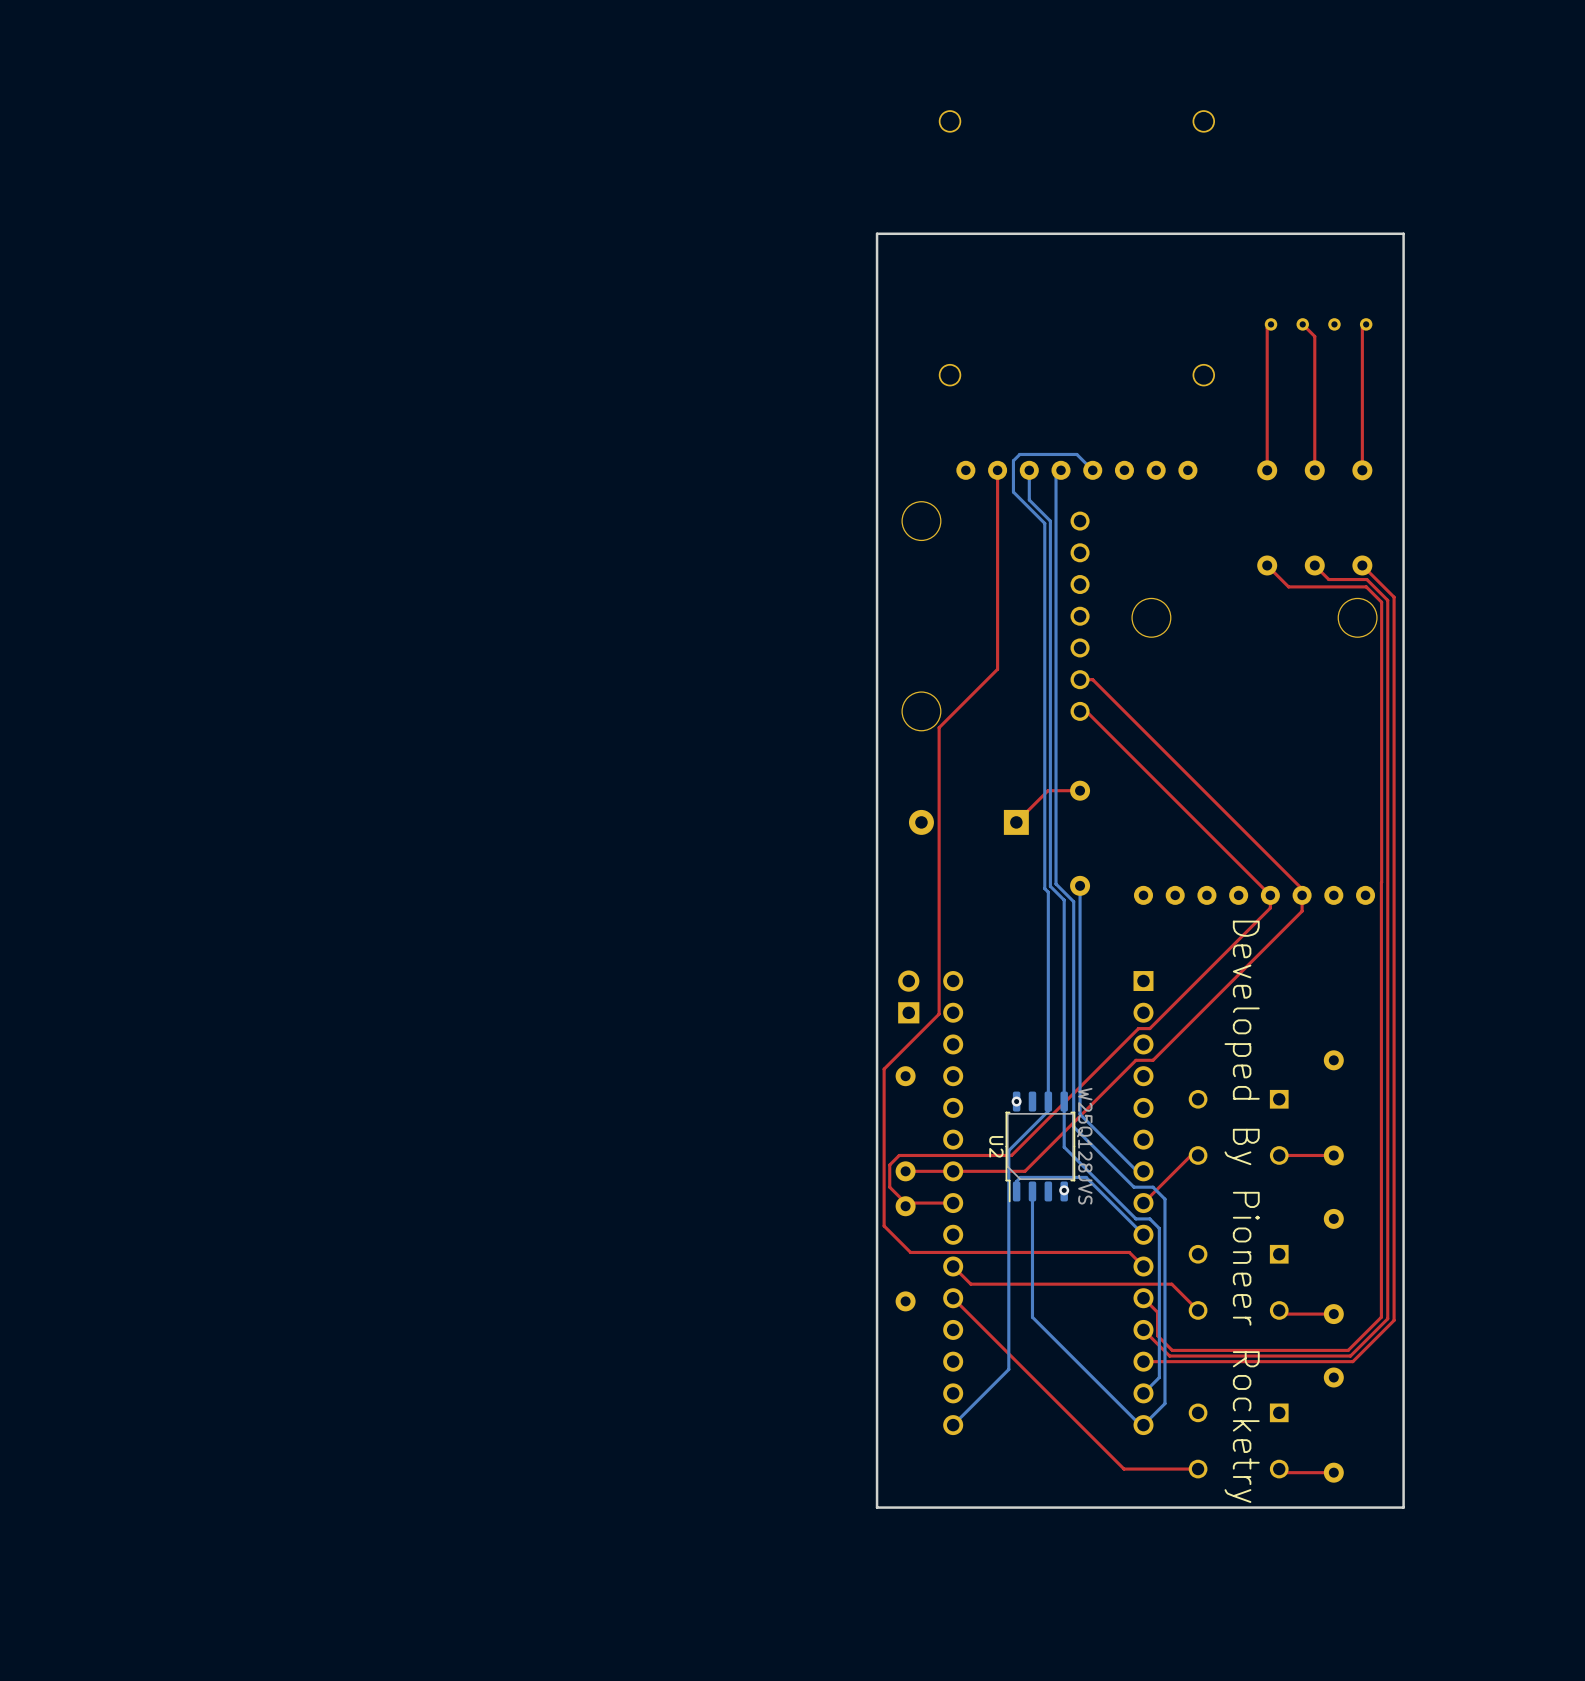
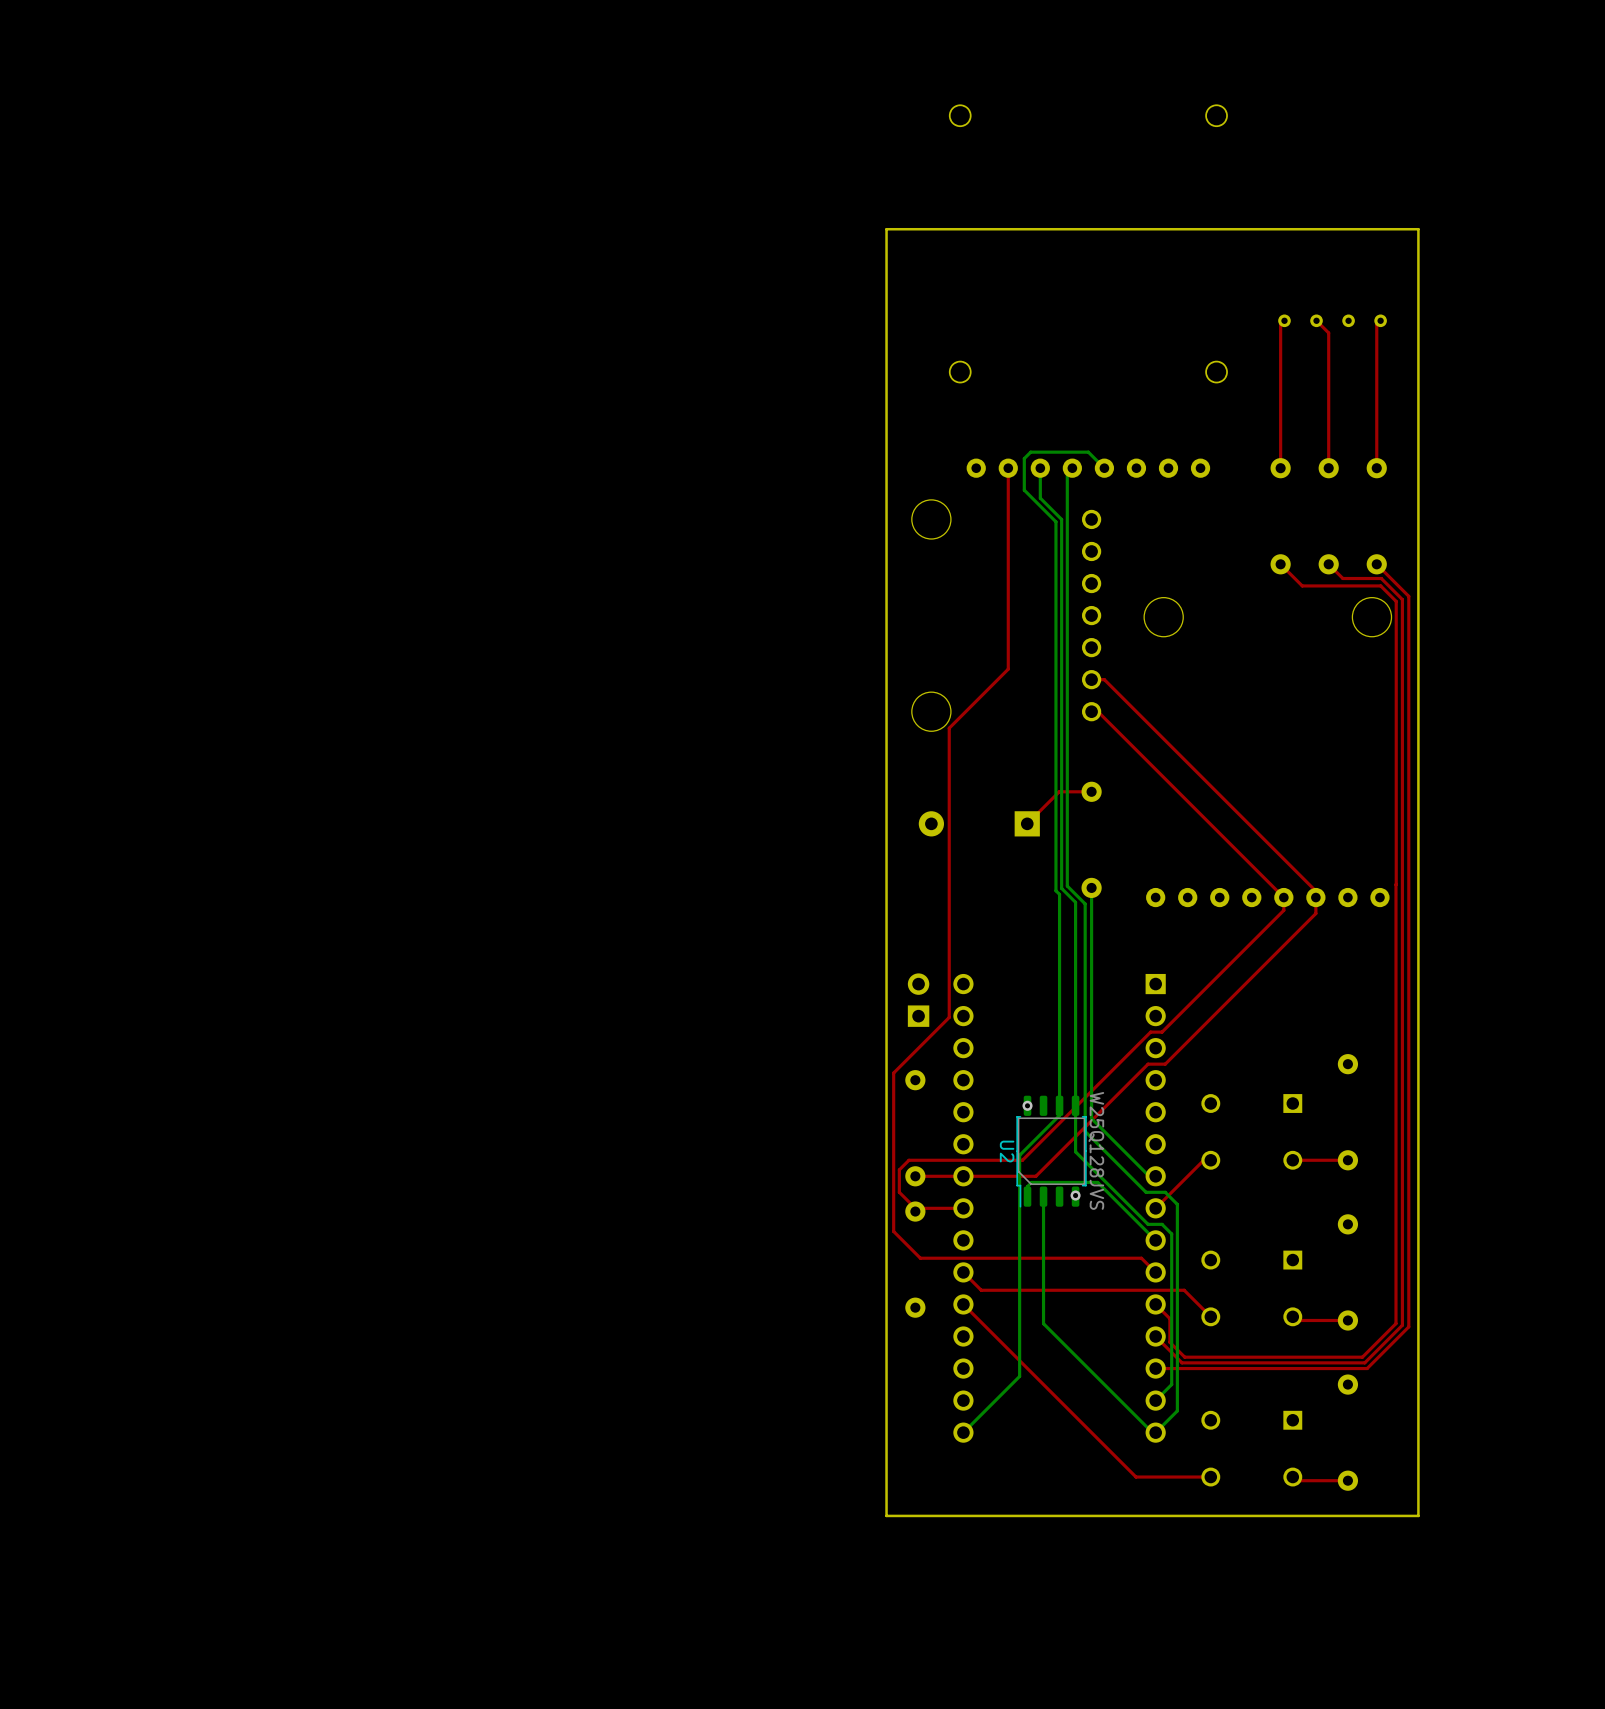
text: Developed By Pioneer Rocketry (1242, 1211) -> none

